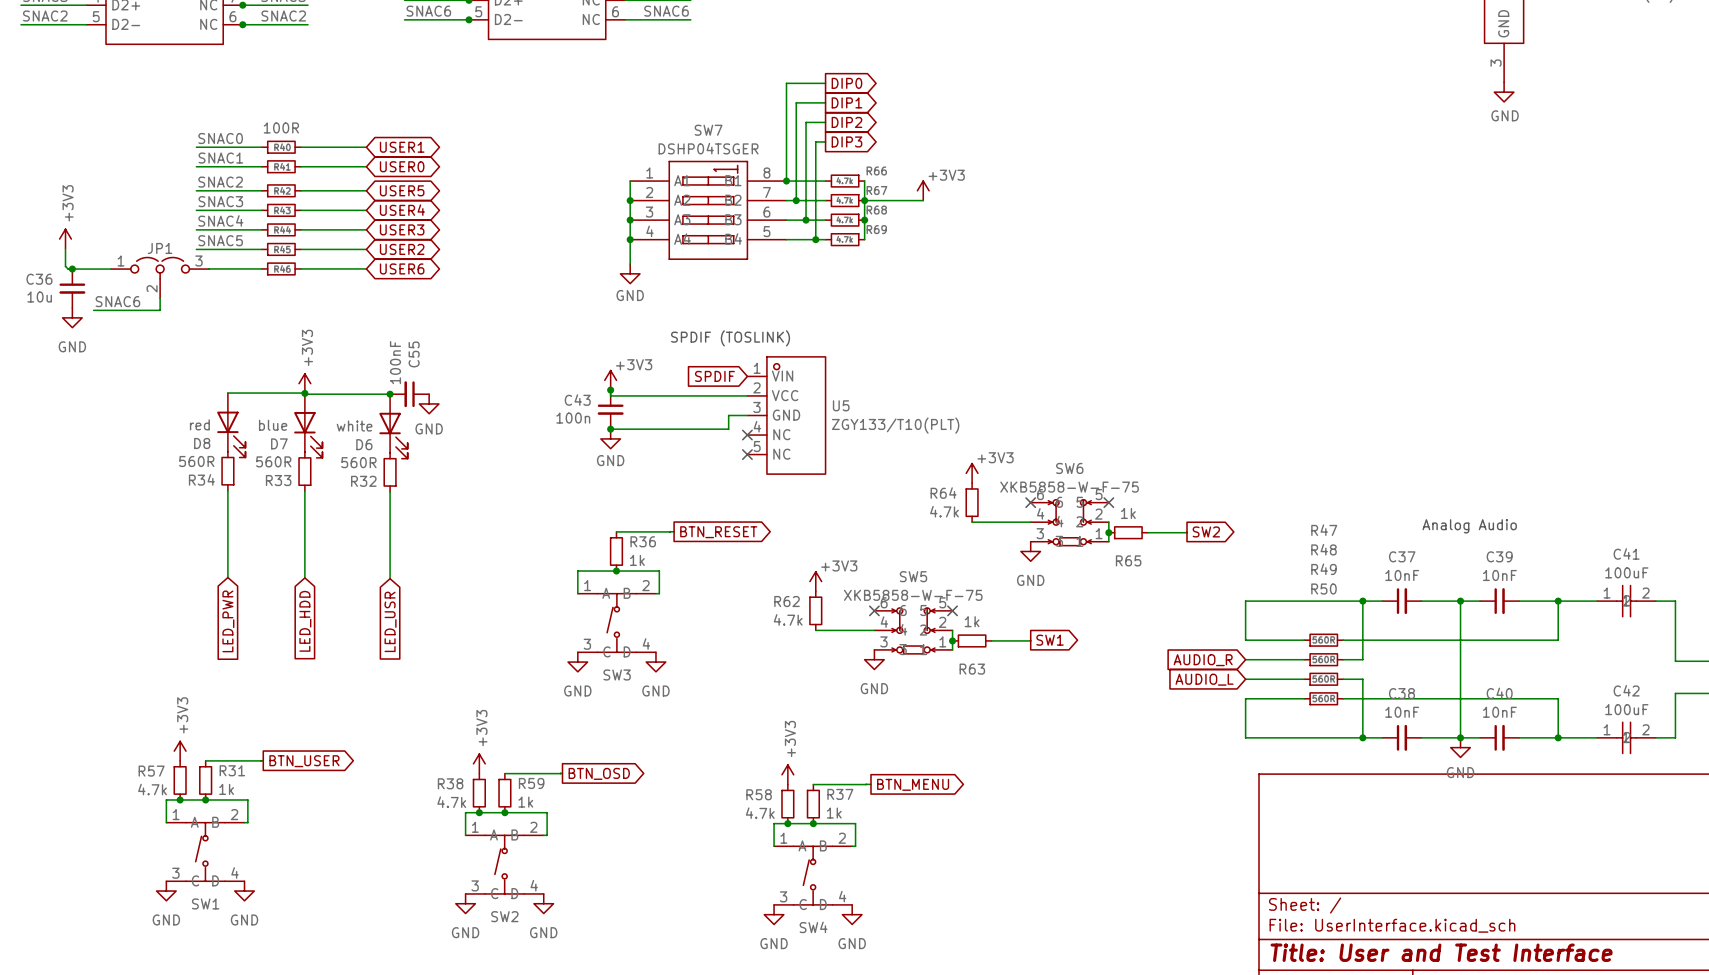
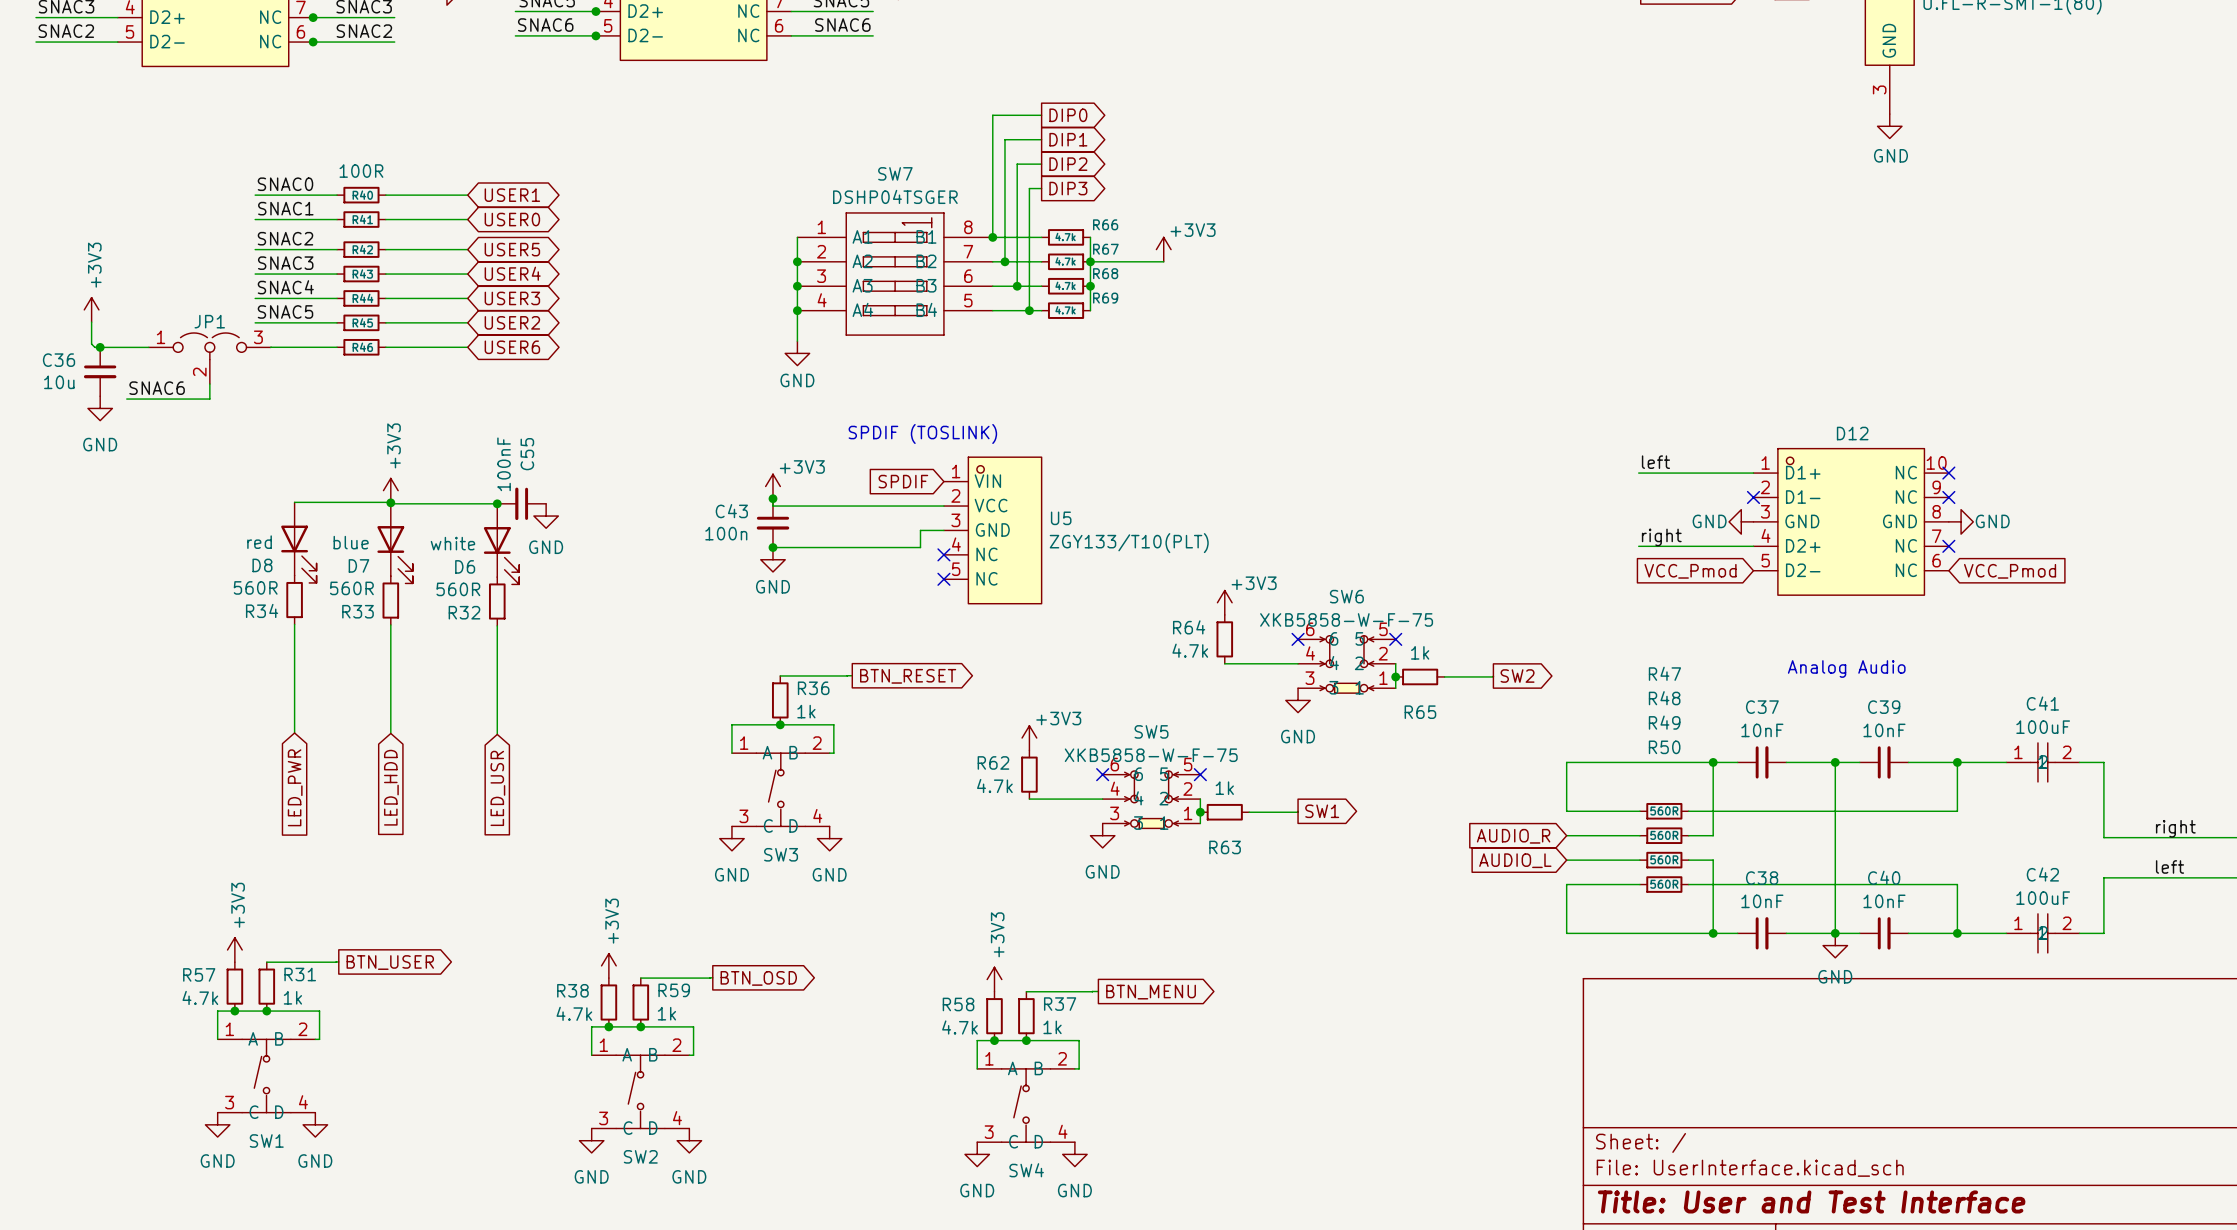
label: none -> left (1655, 462)
wire: none -> (1638, 473) (1753, 473)
no-connect mark: none -> (1948, 473)
no-connect mark: none -> (1753, 497)
no-connect mark: none -> (1948, 497)
power symbol: none -> GND (1741, 521)
D12: none -> (1851, 521)
power symbol: none -> GND (1961, 521)
label: none -> right (1661, 537)
wire: none -> (1638, 546) (1753, 546)
no-connect mark: none -> (1948, 546)
global label: none -> VCC_Pmod (1690, 571)
global label: none -> VCC_Pmod (2010, 571)

